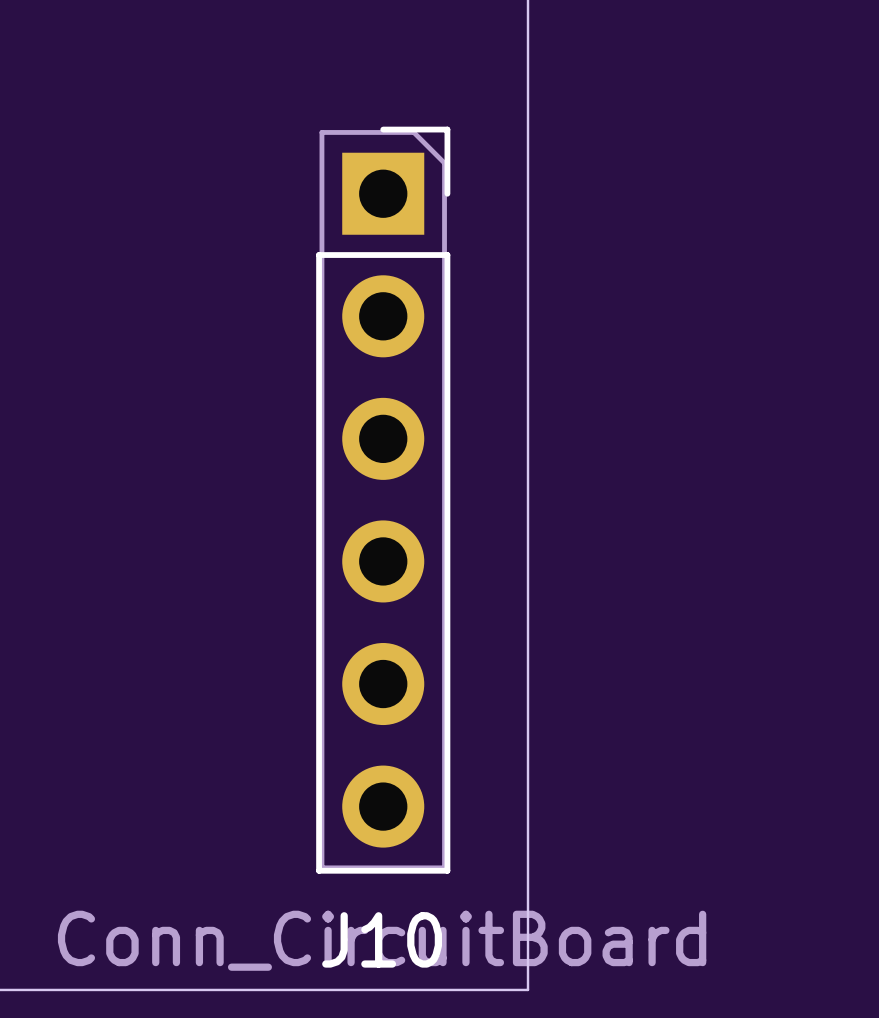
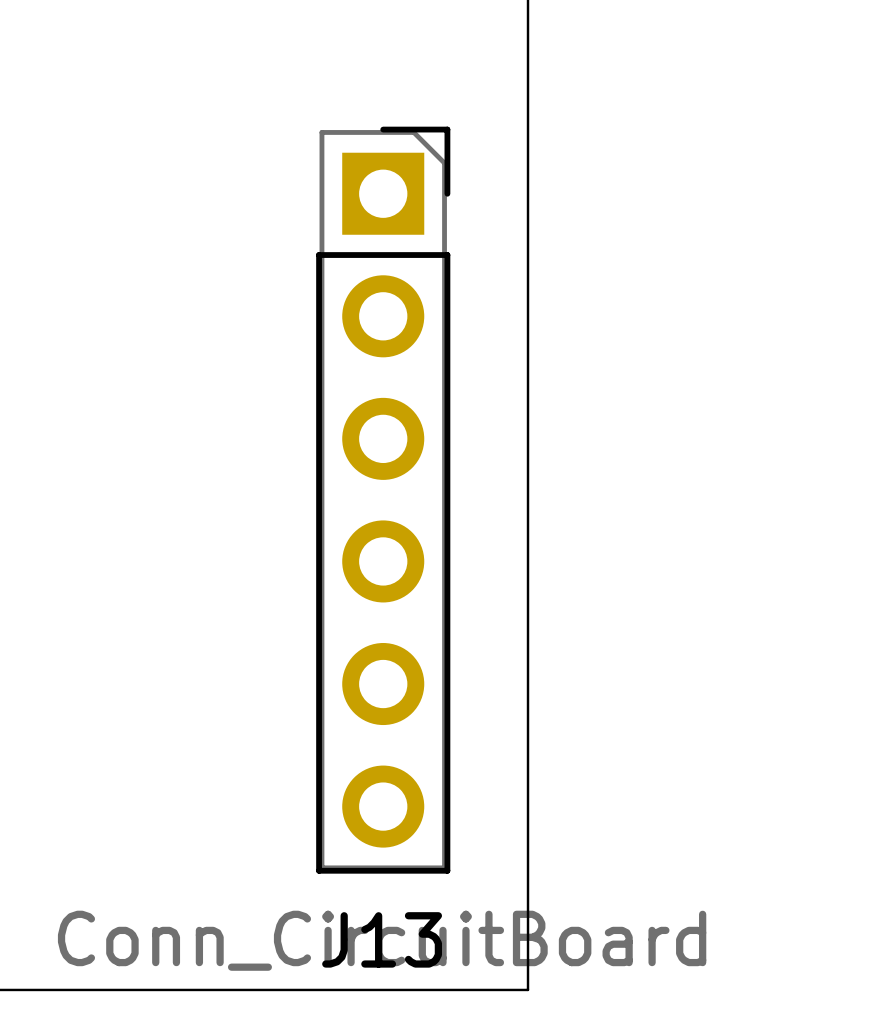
J10 name: J10 (382, 939) -> J13 (382, 939)

